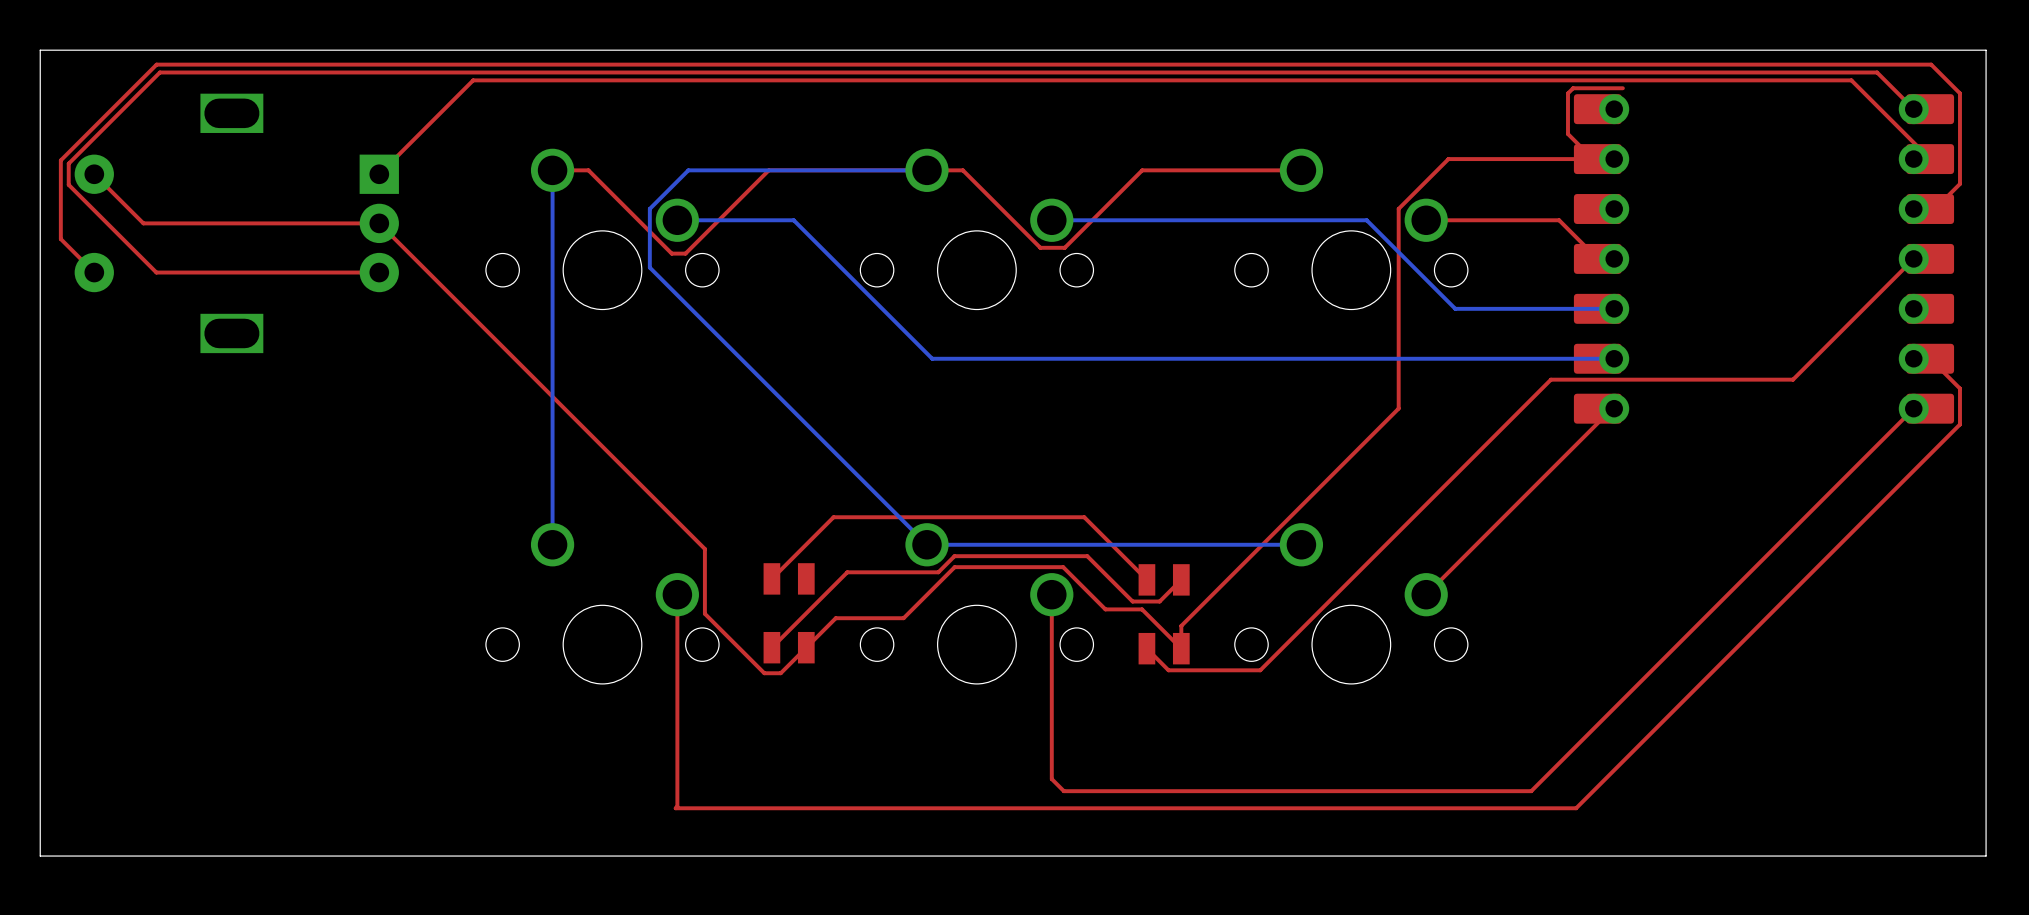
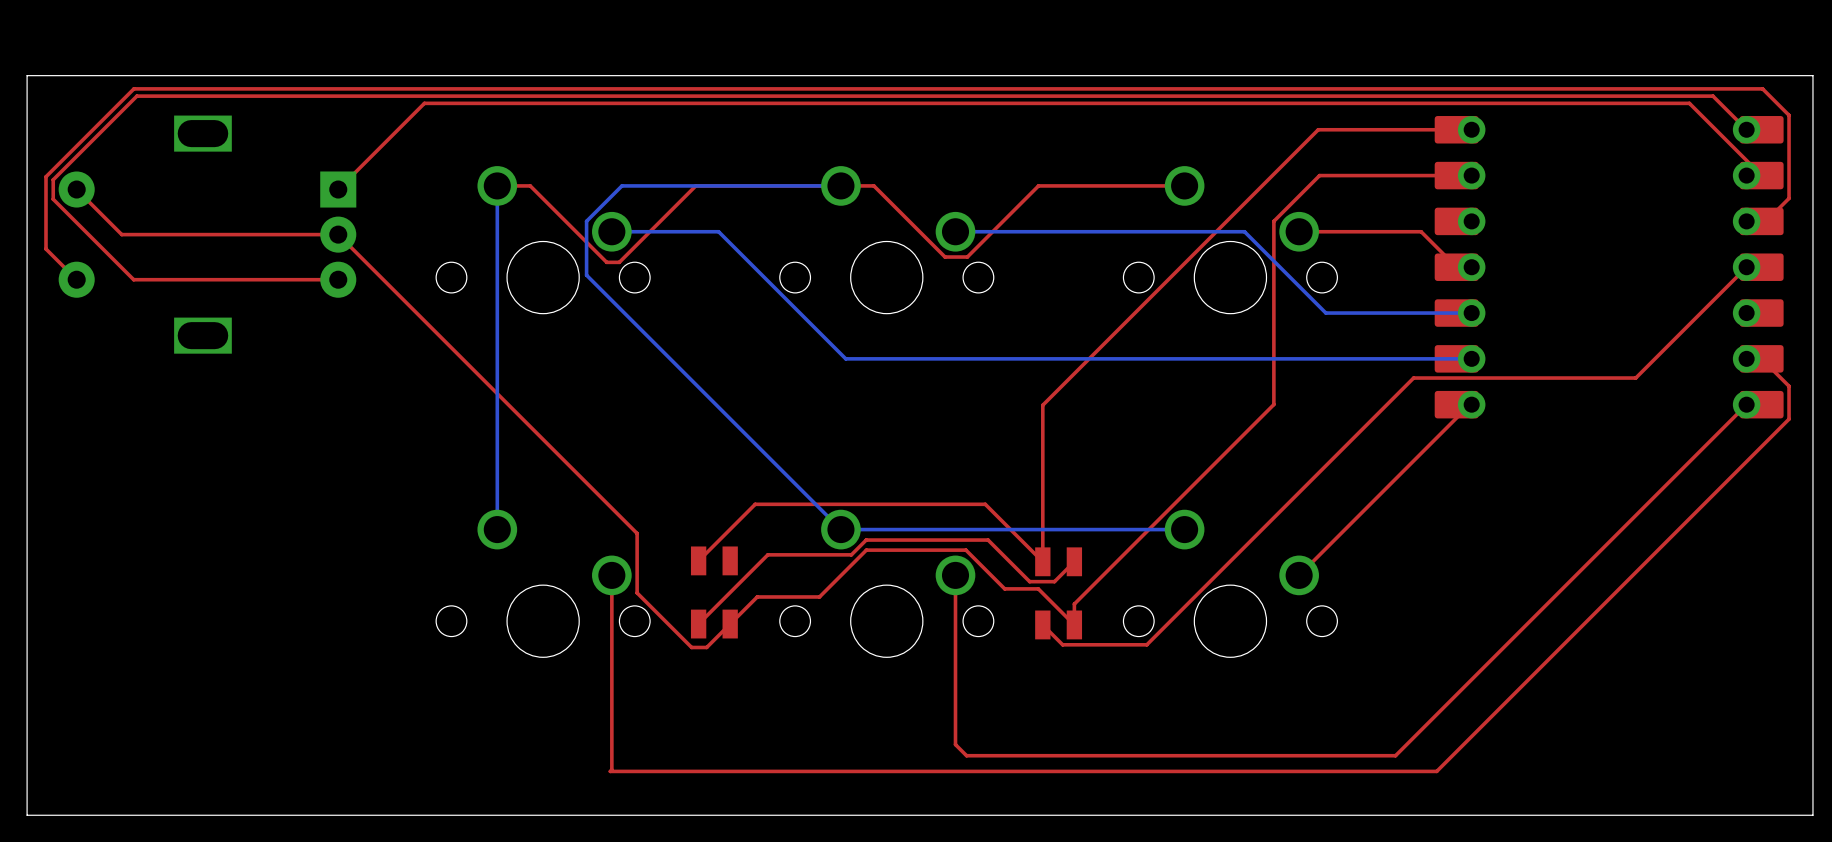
top track: (1622, 88) (1573, 88) (1567, 93) (1567, 134) (1593, 159) -> none
top track: none -> (1456, 129) (1318, 129) (1042, 405) (1042, 561)

